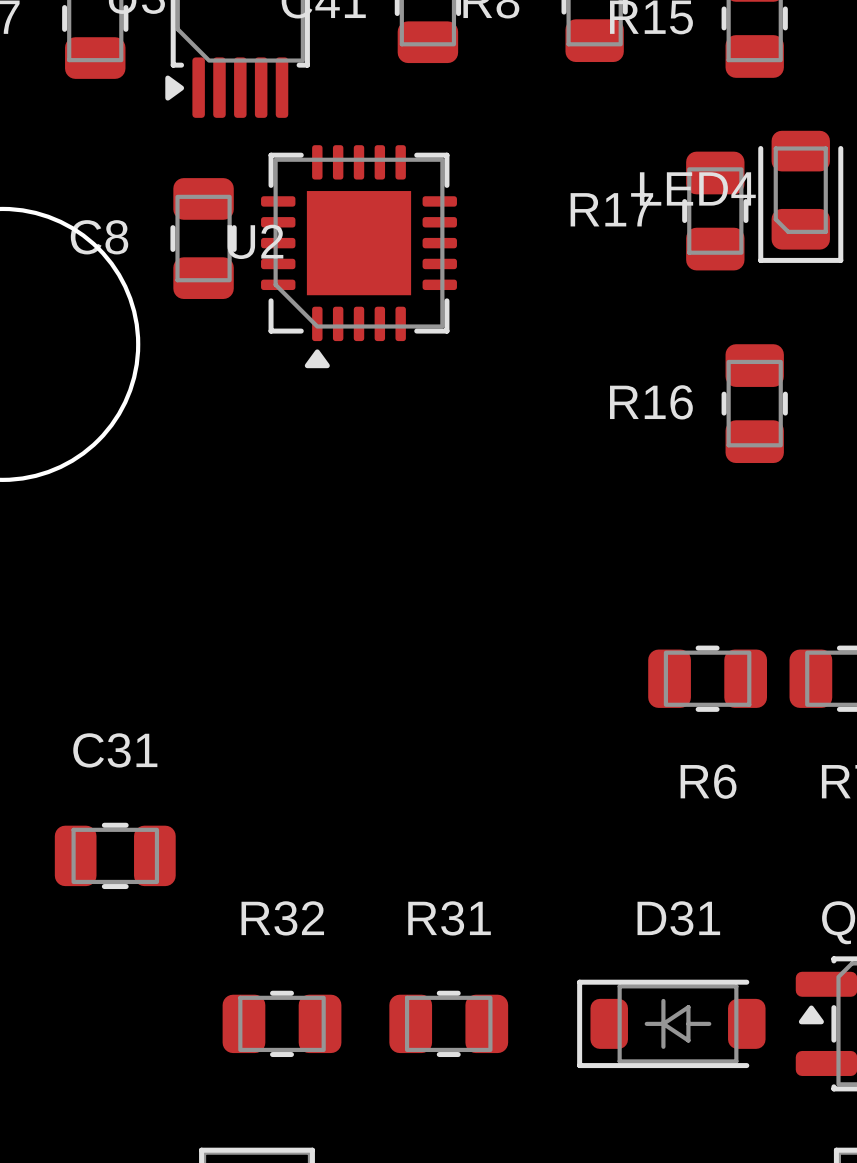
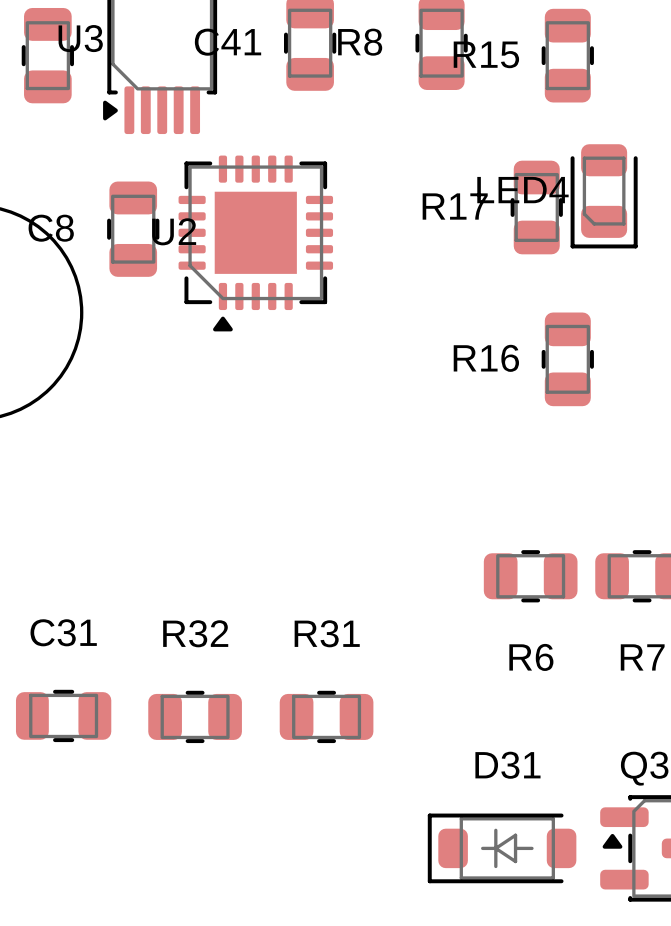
R32 position: (282, 1023) -> (195, 716)
R31 position: (448, 1023) -> (326, 716)

